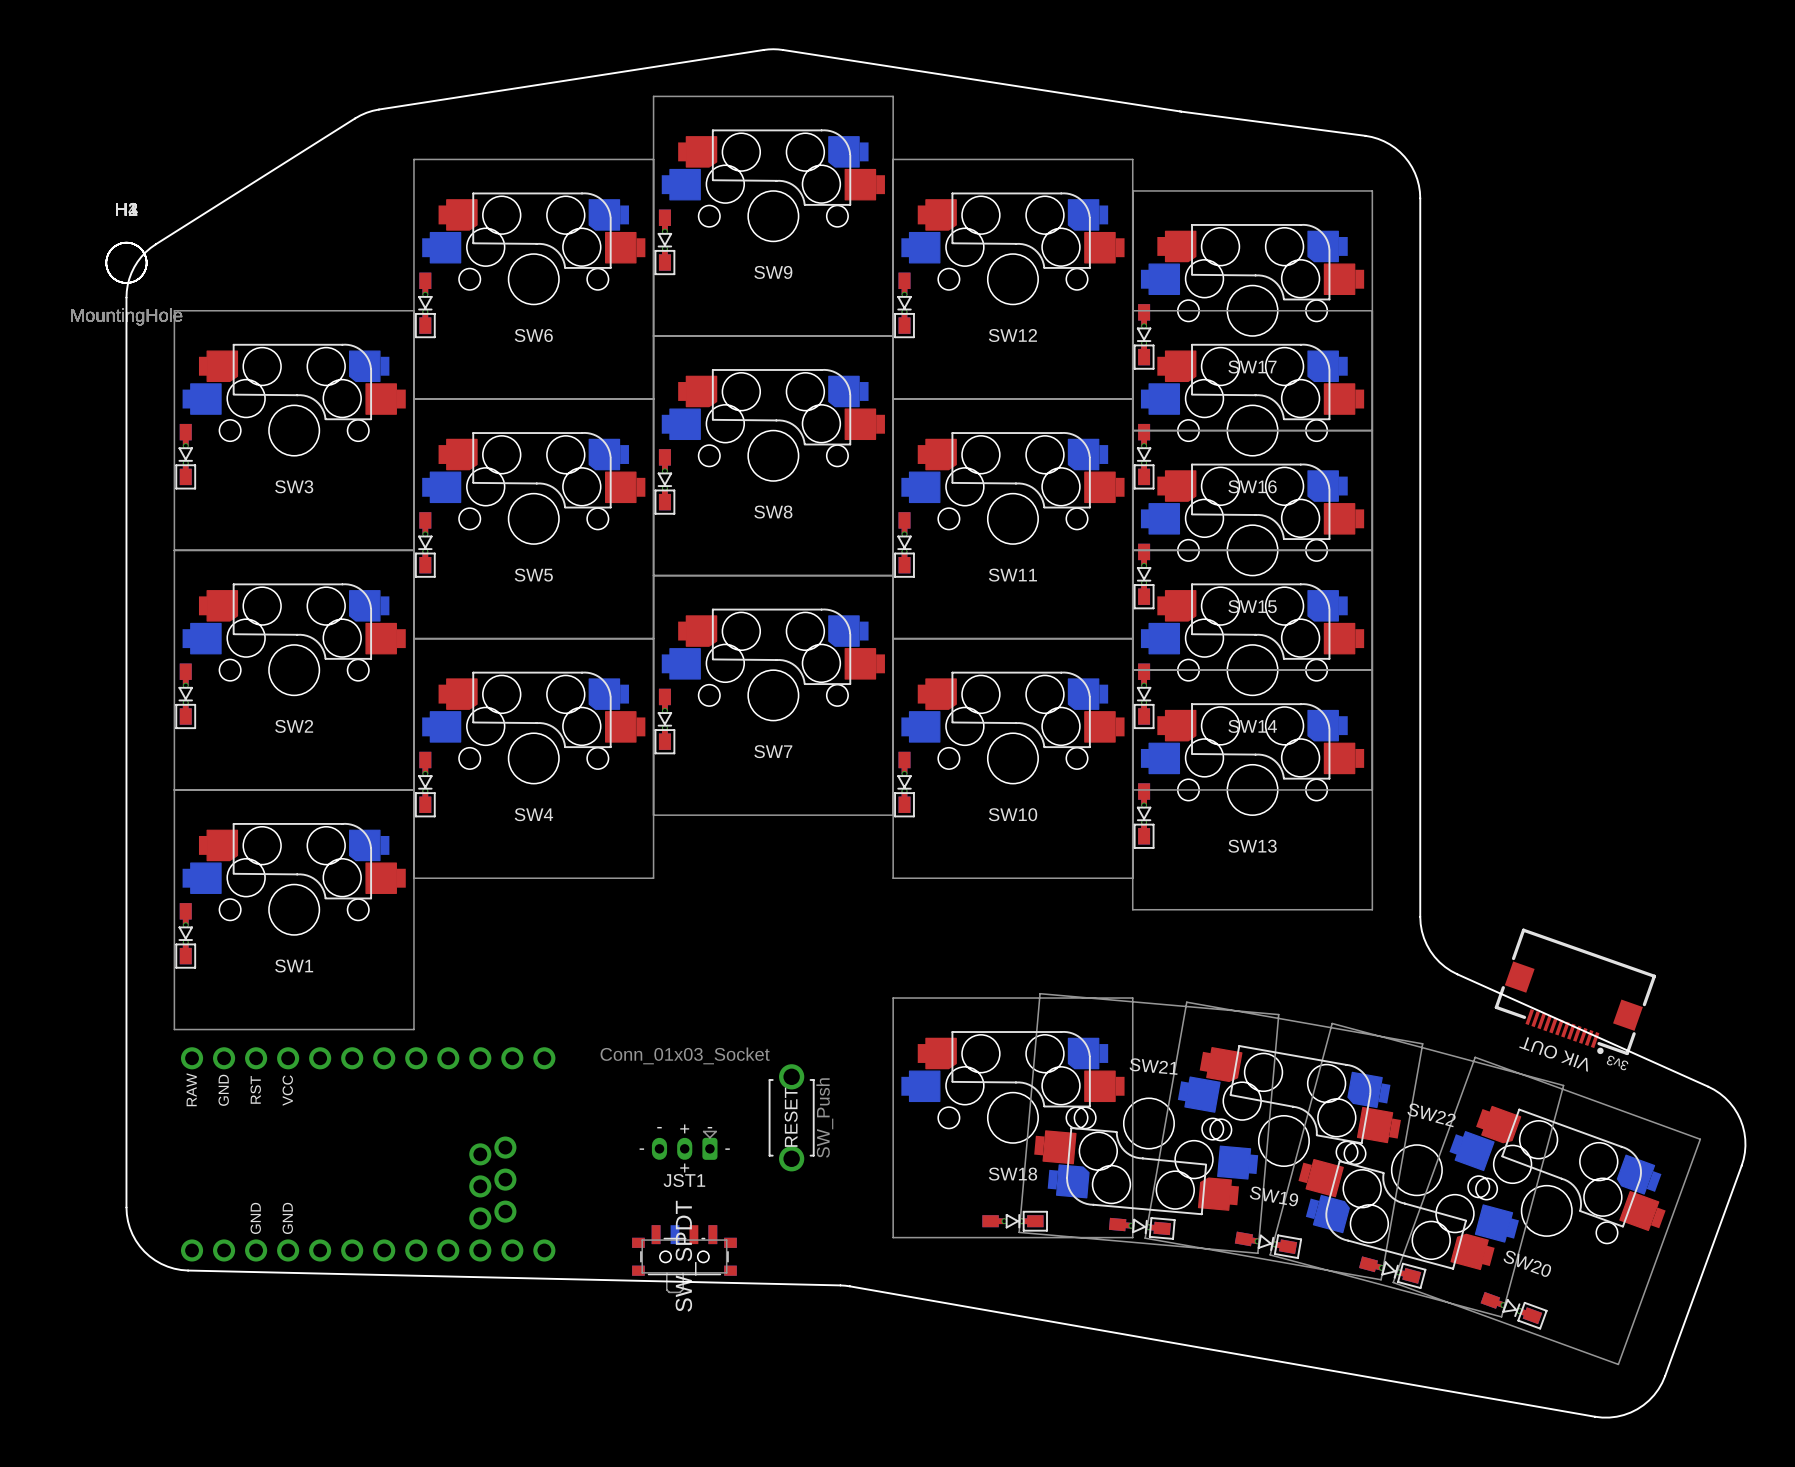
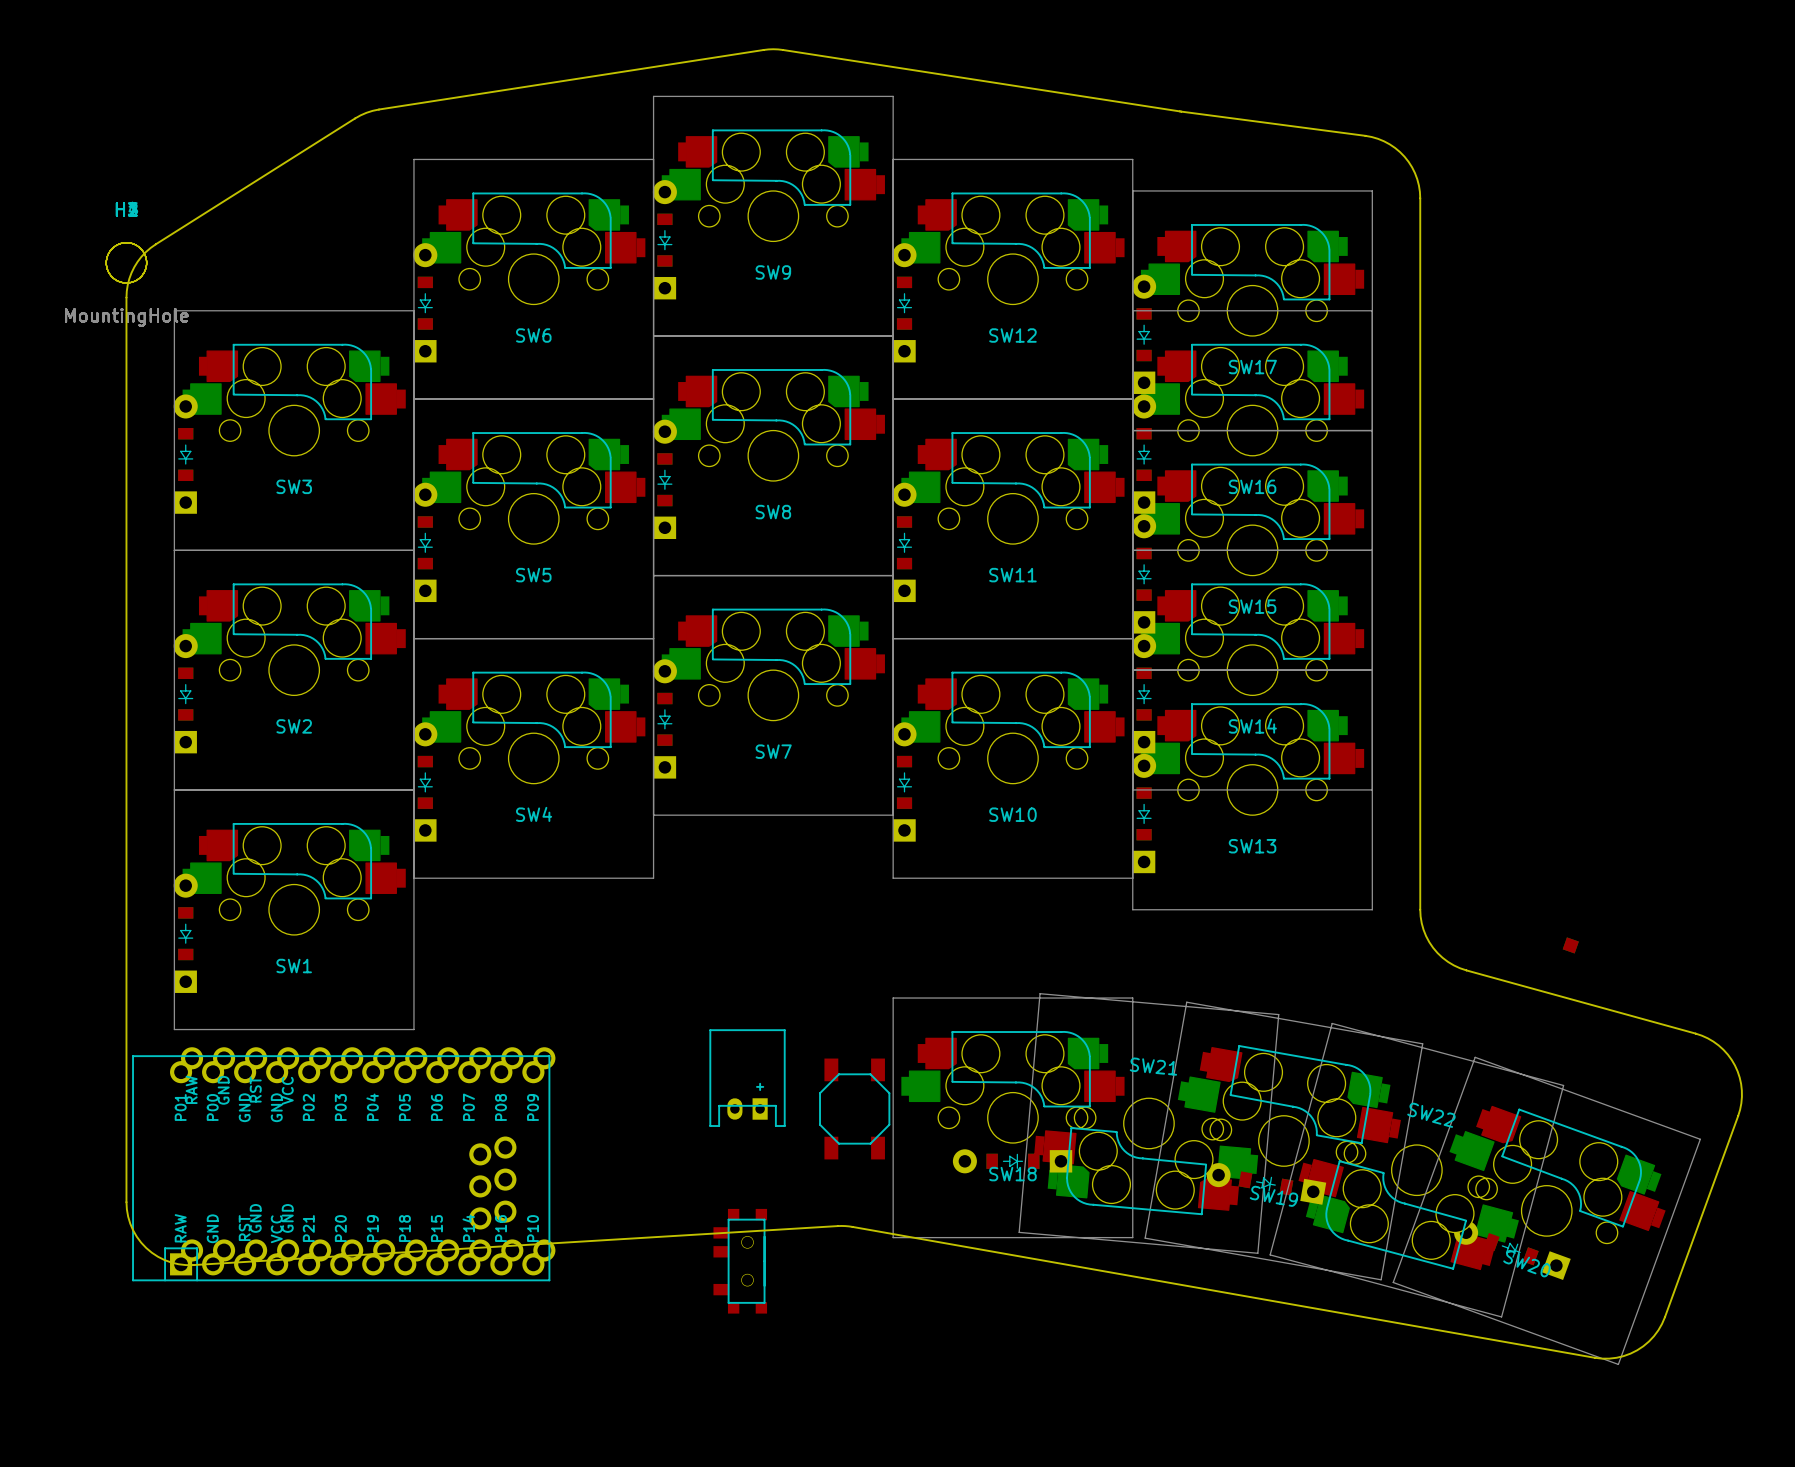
part footprint: [654, 209, 676, 276] -> [652, 180, 677, 300]
part footprint: [414, 272, 436, 339] -> [413, 243, 438, 363]
part footprint: [894, 272, 915, 339] -> [892, 243, 917, 363]
part footprint: [1133, 304, 1155, 370] -> [1132, 274, 1157, 394]
part footprint: [175, 423, 197, 490] -> [173, 394, 198, 514]
part footprint: [1133, 423, 1155, 490] -> [1132, 394, 1157, 514]
part footprint: [654, 449, 676, 515] -> [652, 419, 677, 540]
part footprint: [414, 512, 436, 578] -> [413, 482, 438, 603]
part footprint: [894, 512, 915, 578] -> [892, 482, 917, 603]
part footprint: [1133, 543, 1155, 610] -> [1132, 514, 1157, 634]
part footprint: [175, 663, 197, 730] -> [173, 634, 198, 754]
part footprint: [1133, 663, 1155, 730] -> [1132, 634, 1157, 754]
part footprint: [654, 688, 676, 755] -> [652, 659, 677, 779]
part footprint: [414, 751, 436, 818] -> [413, 722, 438, 842]
part footprint: [894, 751, 915, 818] -> [892, 722, 917, 842]
part footprint: [1133, 783, 1155, 849] -> [1132, 753, 1157, 874]
part footprint: [175, 903, 197, 969] -> [173, 873, 198, 993]
board edge: (1420, 909) (1421, 931) (1426, 944) (1439, 962) (1451, 971) (1708, 1086) (1729, 1102) (1740, 1119) (1745, 1139) (1743, 1159) (1665, 1376) (1658, 1389) (1649, 1400) (1630, 1412) (1616, 1416) (1594, 1416) (845, 1285) (181, 1269) (161, 1263) (149, 1256) (139, 1246) (129, 1228) (126, 1202) -> (1420, 909) (1421, 923) (1429, 942) (1437, 953) (1453, 965) (1701, 1035) (1718, 1045) (1734, 1065) (1741, 1090) (1738, 1115) (1662, 1323) (1648, 1341) (1630, 1353) (1616, 1357) (1594, 1357) (845, 1226) (185, 1265) (164, 1260) (146, 1248) (136, 1236) (130, 1223) (126, 1202)
part: none -> (1570, 945)
part: (1575, 991) -> none
part: none -> (747, 1078)
part: none -> (854, 1108)
part: SW_Push (791, 1117) -> none
JST1: Conn_01x03_Socket (684, 1145) -> none
part: none -> (1012, 1161)
part: none -> (341, 1168)
part: none -> (1266, 1183)
part: (1015, 1221) -> none
part: (1142, 1228) -> none
part: (1268, 1245) -> none
part: none -> (1512, 1250)
part: SW_SPDT (684, 1259) -> none
part: none -> (740, 1261)
part: (1392, 1272) -> none
part: (1514, 1310) -> none

